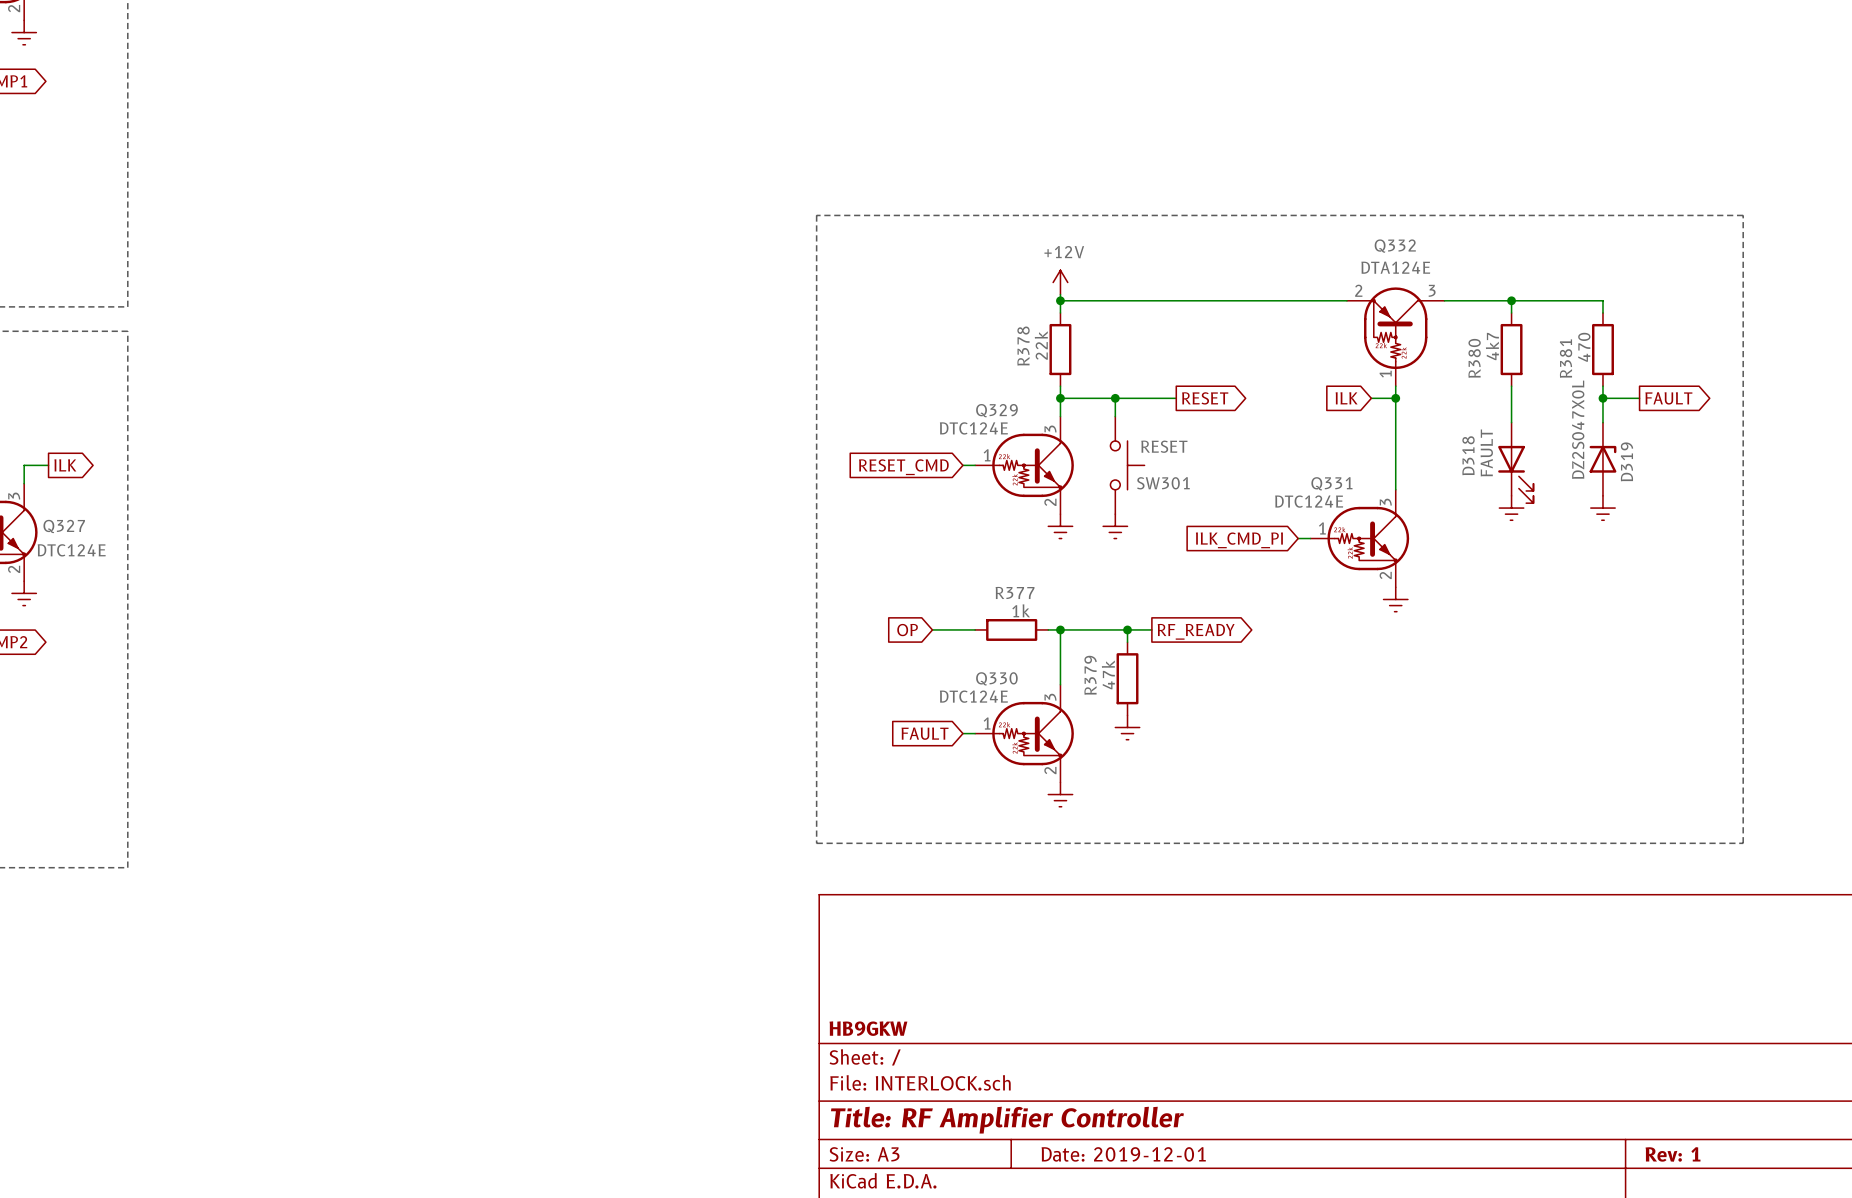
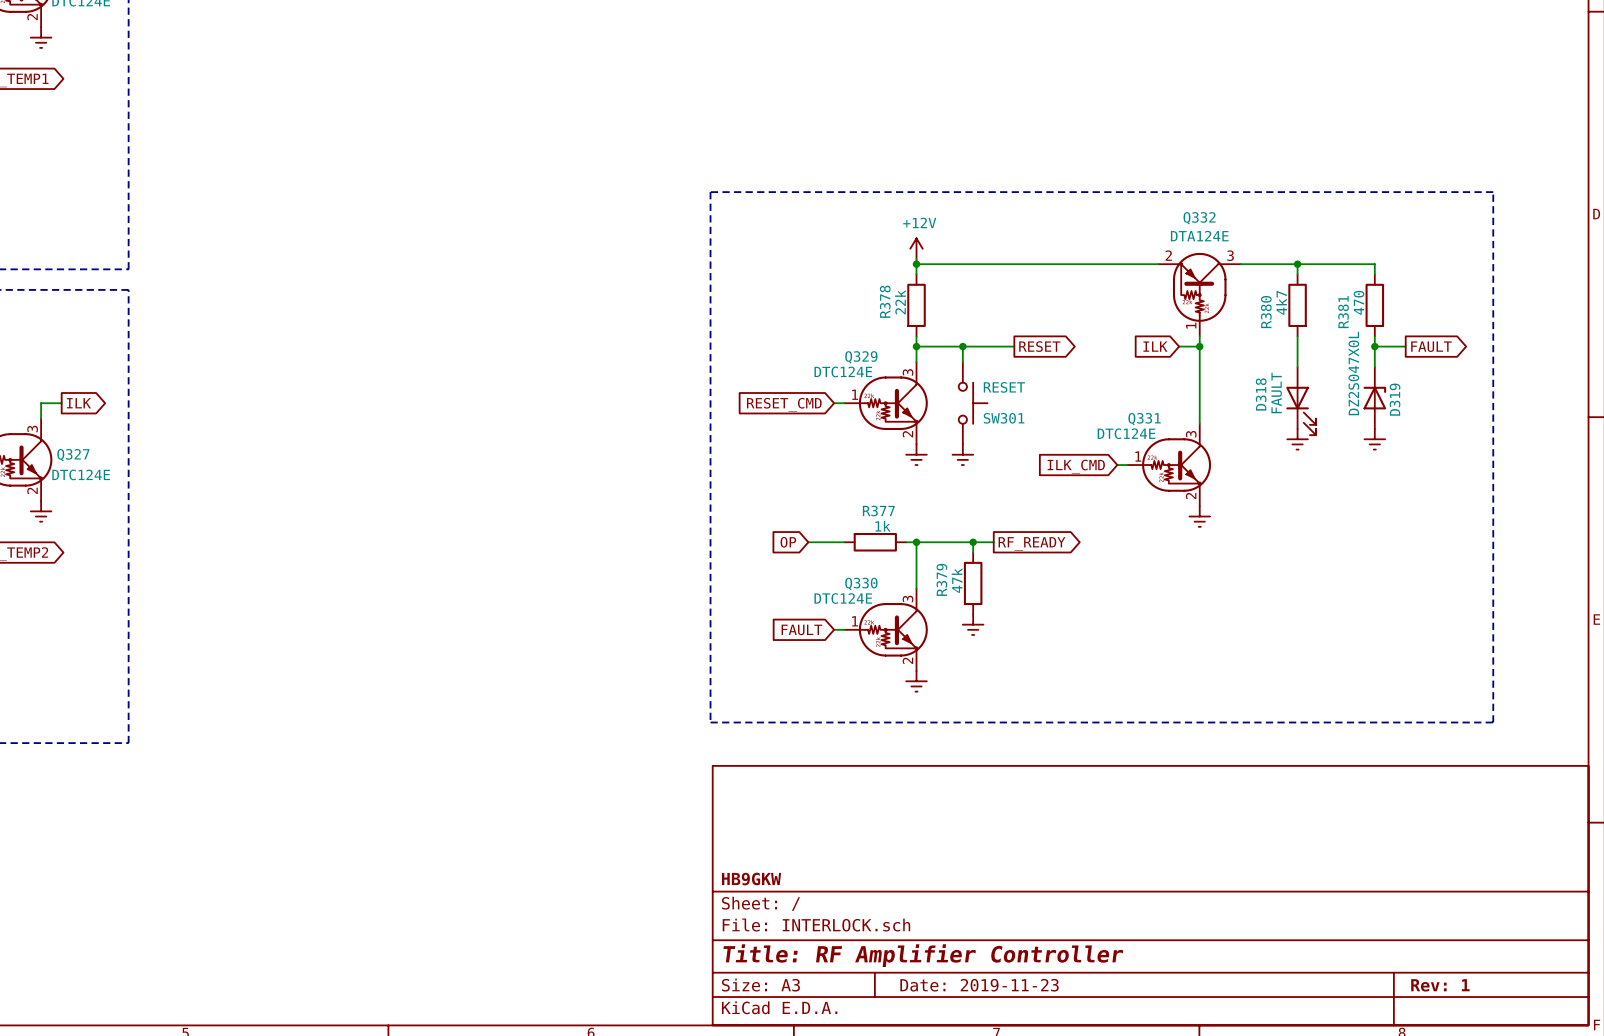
global label: ILK_CMD_PI (1239, 540) -> ILK_CMD (1076, 466)
title block: Date: 2019-12-01 (1123, 1154) -> Date: 2019-11-23 (979, 985)

